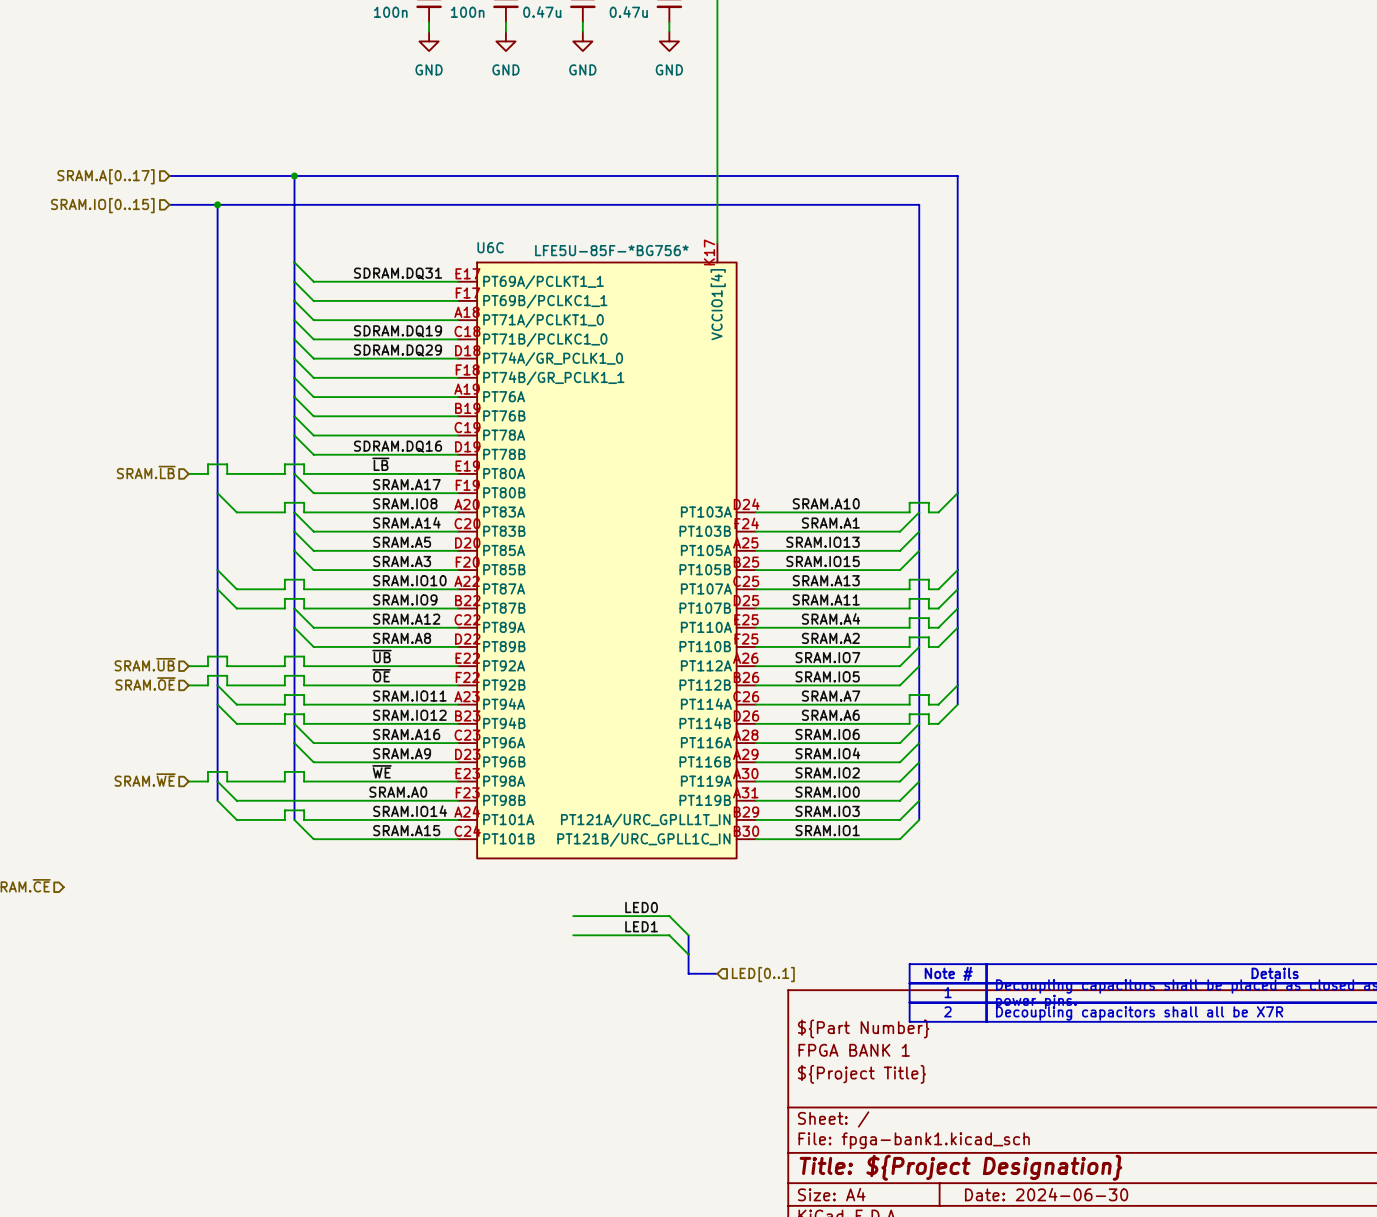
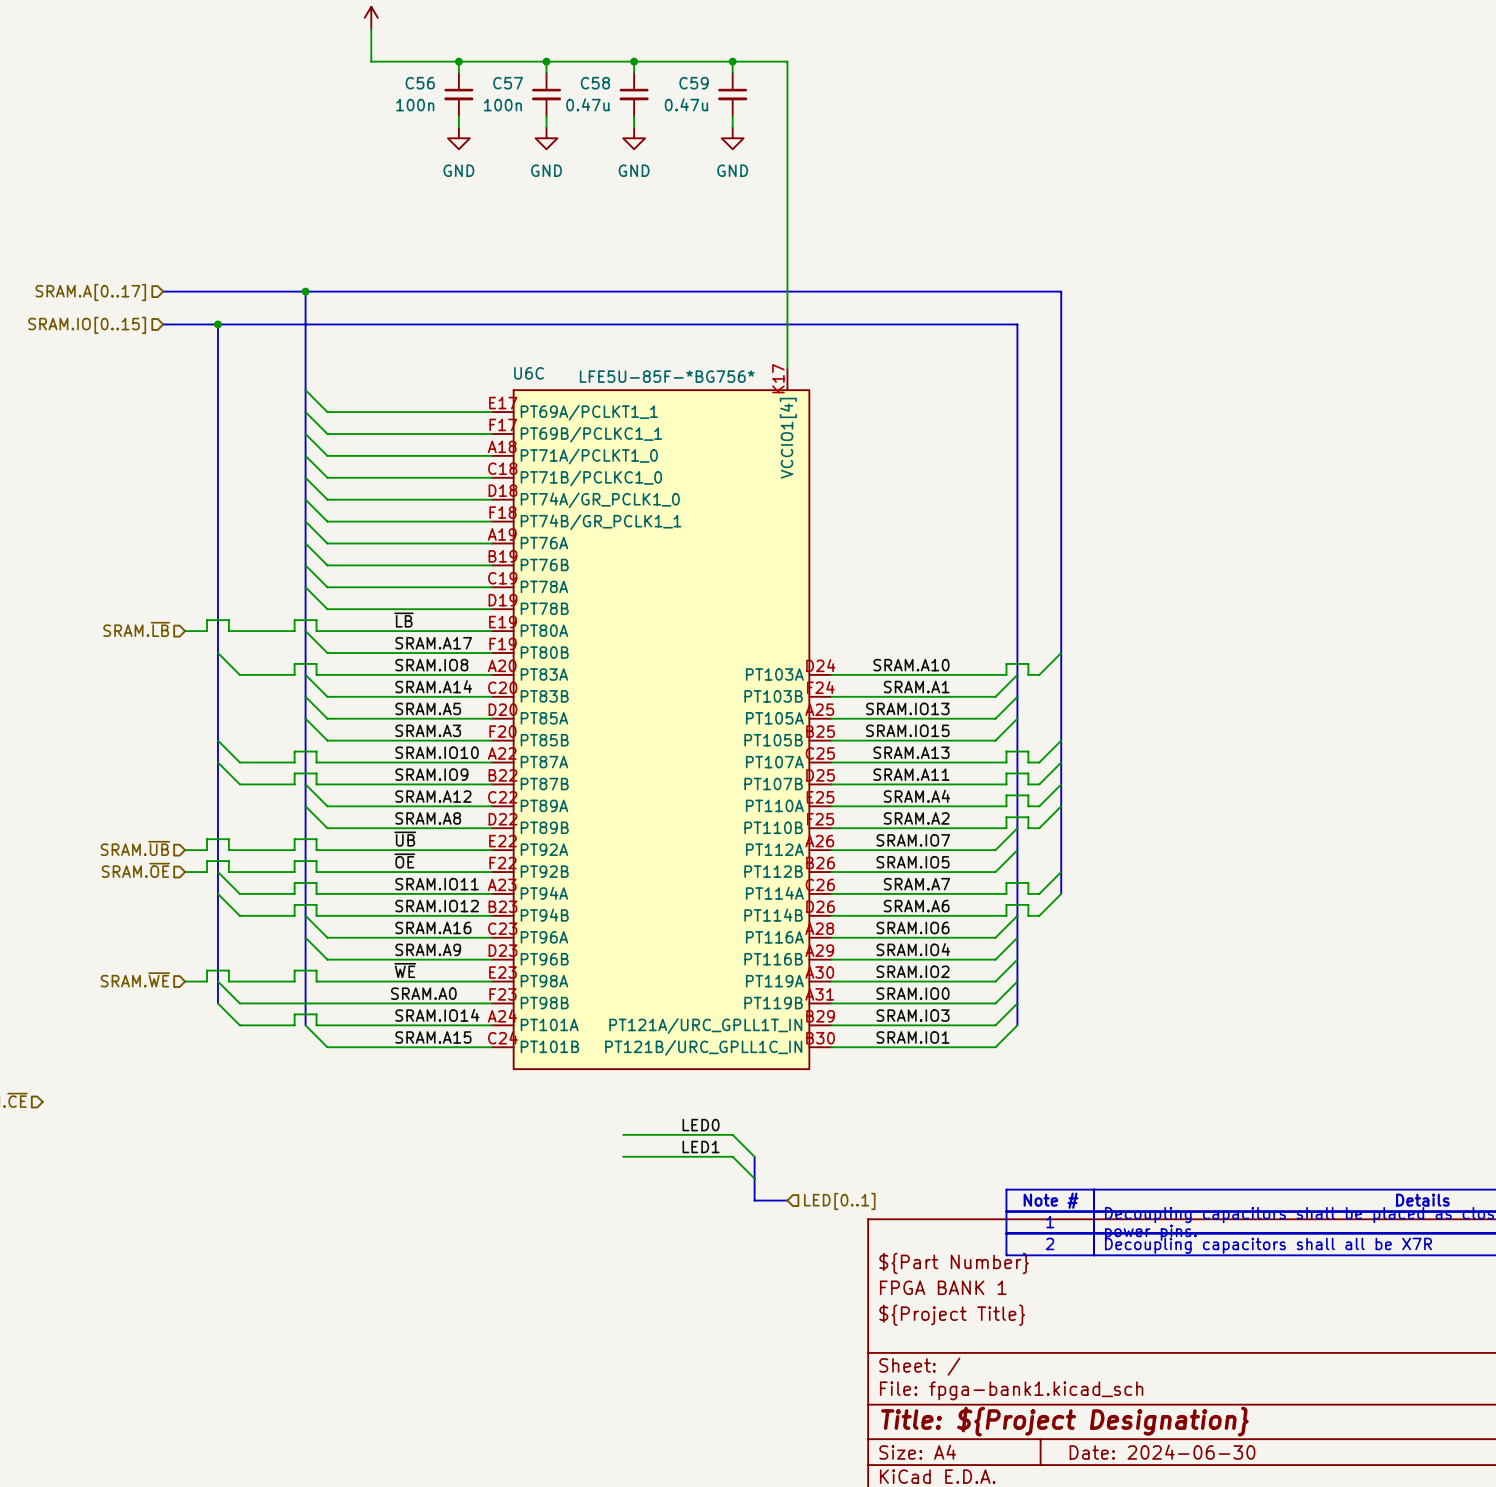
label: SDRAM.DQ31 (398, 273) -> none
label: SDRAM.DQ19 (398, 331) -> none
label: SDRAM.DQ29 (398, 350) -> none
label: SDRAM.DQ16 (398, 446) -> none

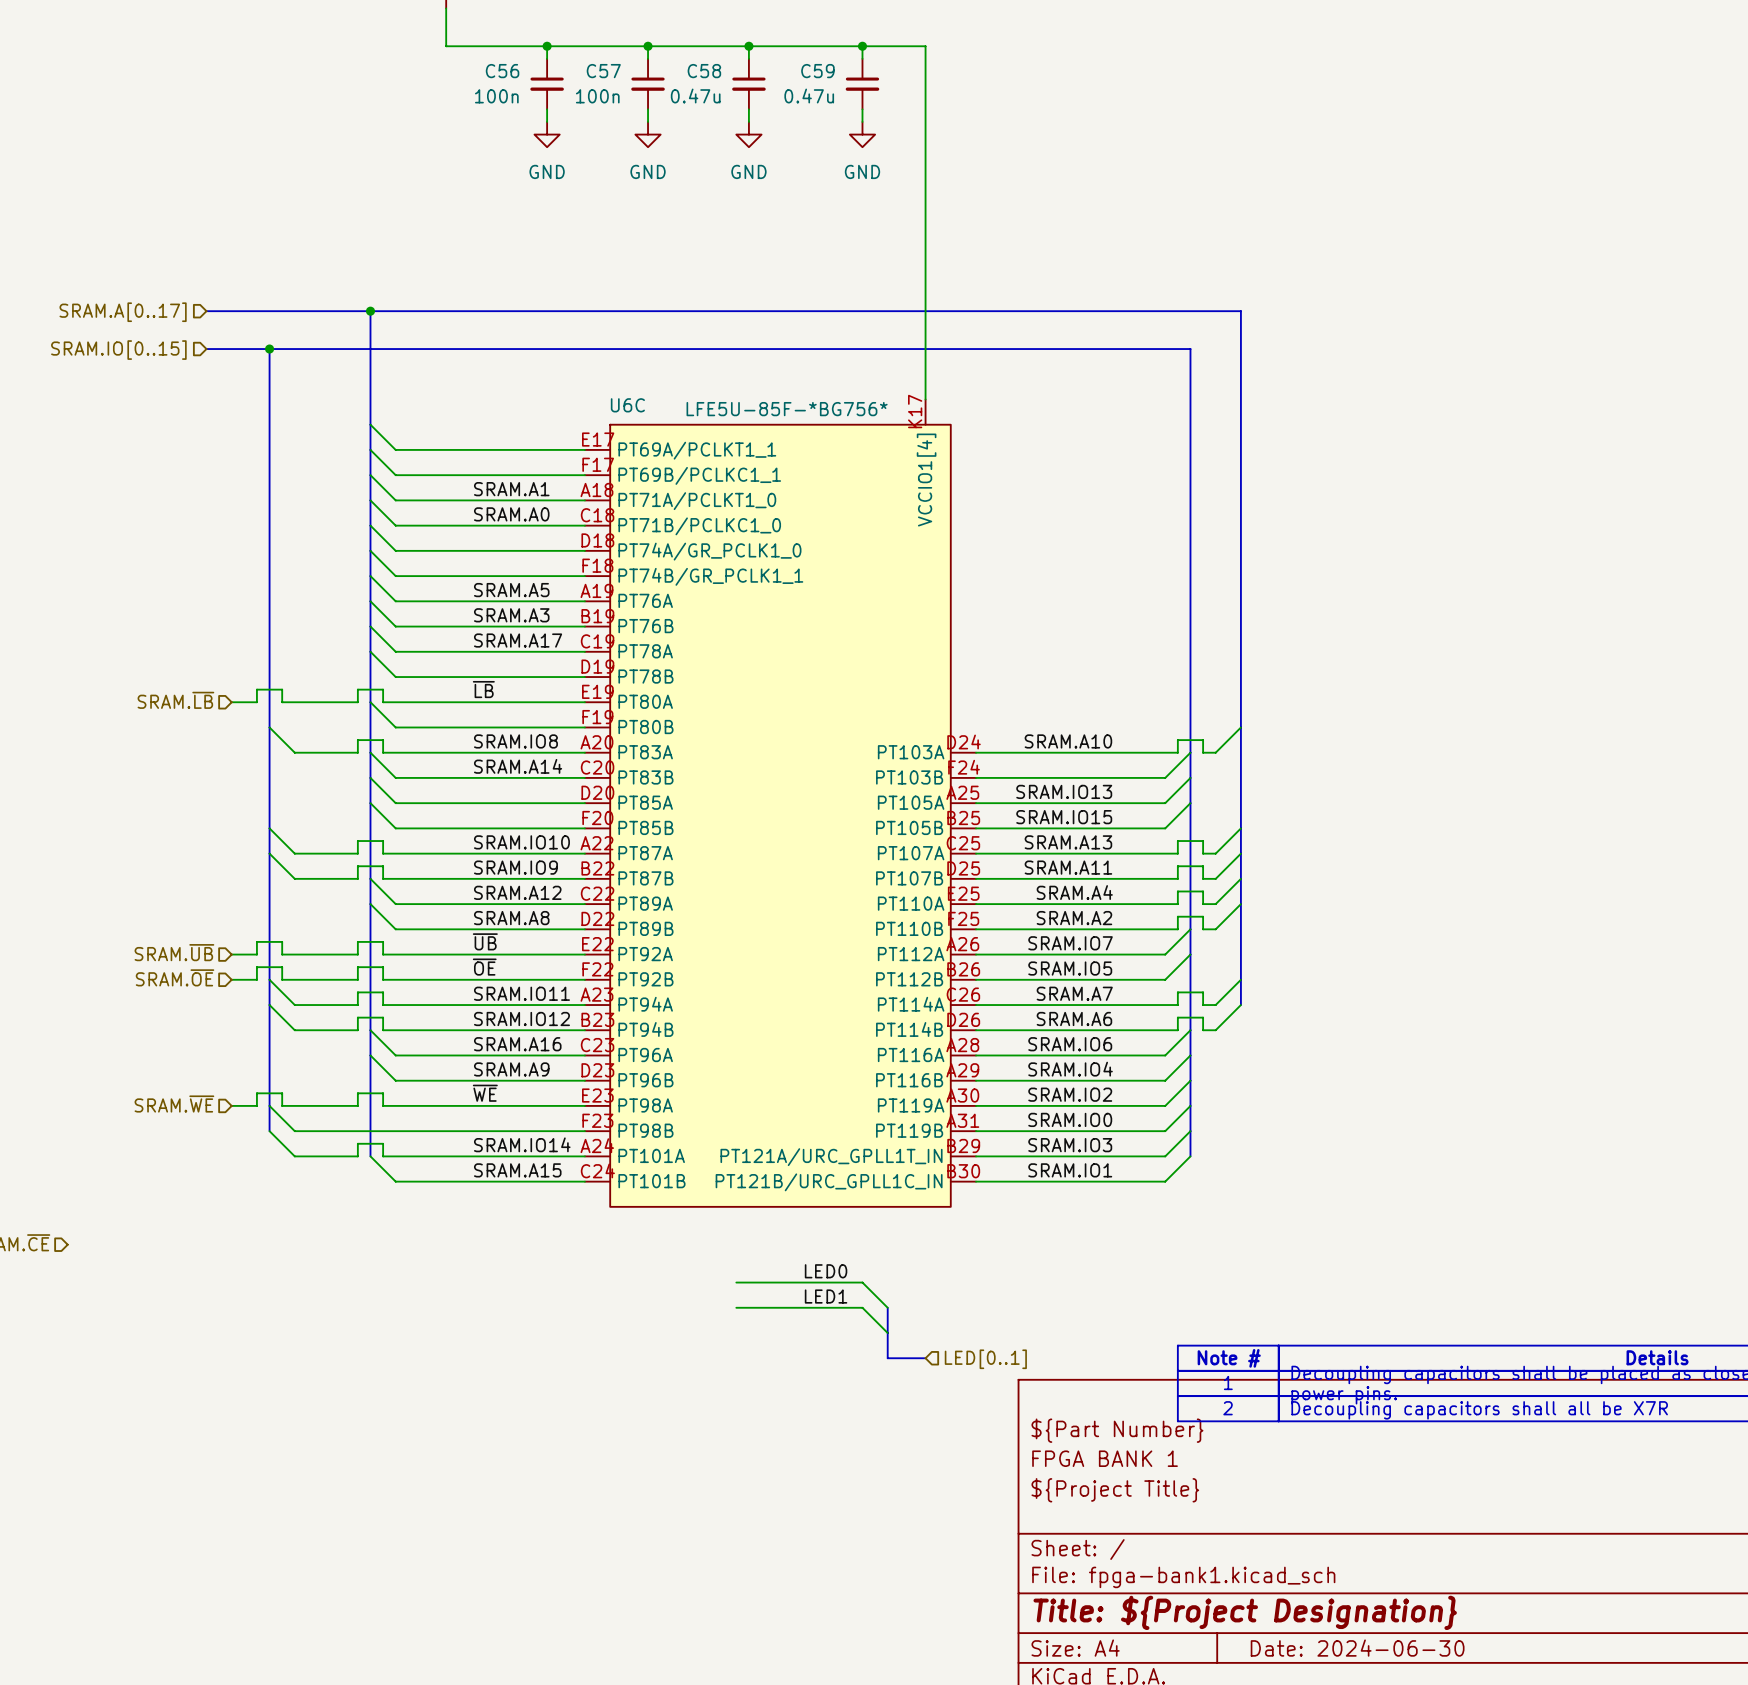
label: none -> SRAM.A1 (511, 489)
label: none -> SRAM.A0 (511, 514)
label position: SRAM.A17 (433, 643) -> SRAM.A17 (518, 640)
label: SRAM.A1 (916, 687) -> none
label position: SRAM.A5 (428, 708) -> SRAM.A5 (511, 590)
label position: SRAM.A3 (428, 730) -> SRAM.A3 (511, 615)
label: SRAM.A0 (423, 993) -> none

